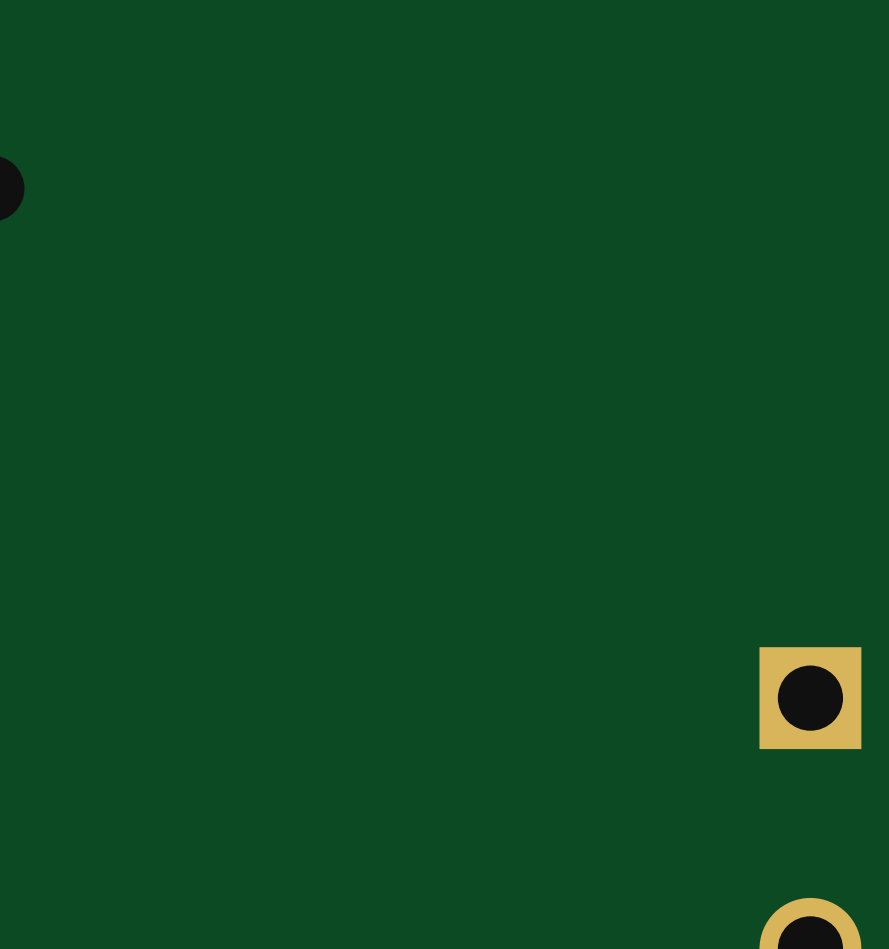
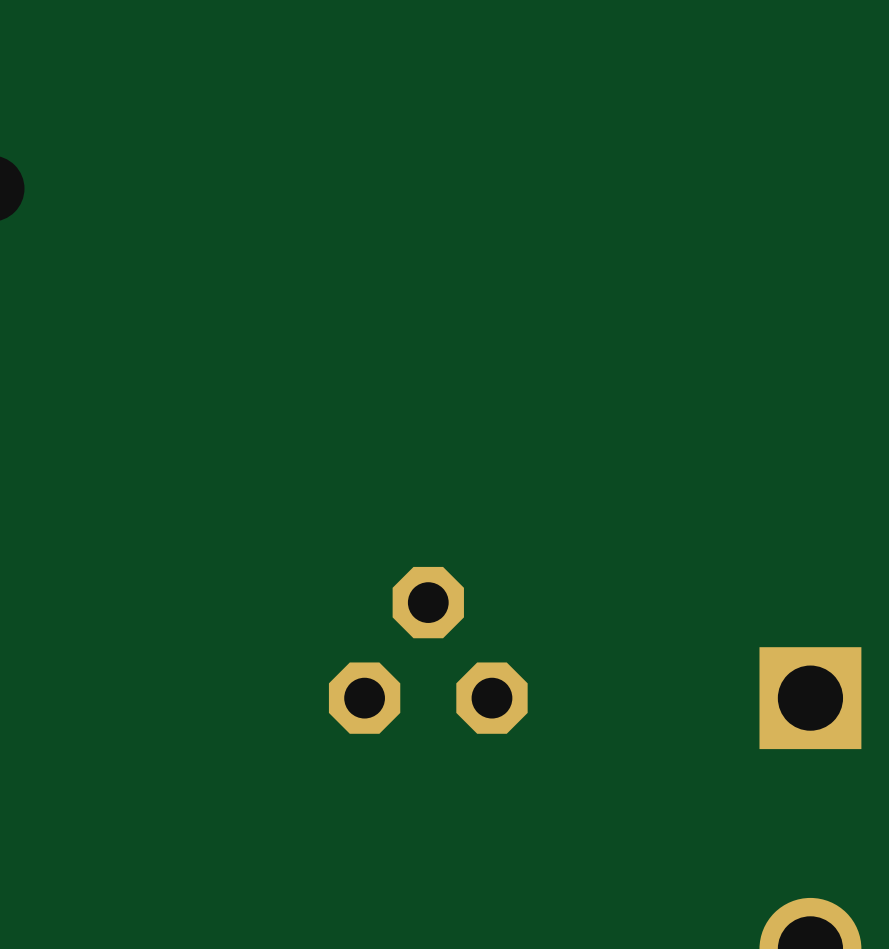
part: none -> (428, 650)

